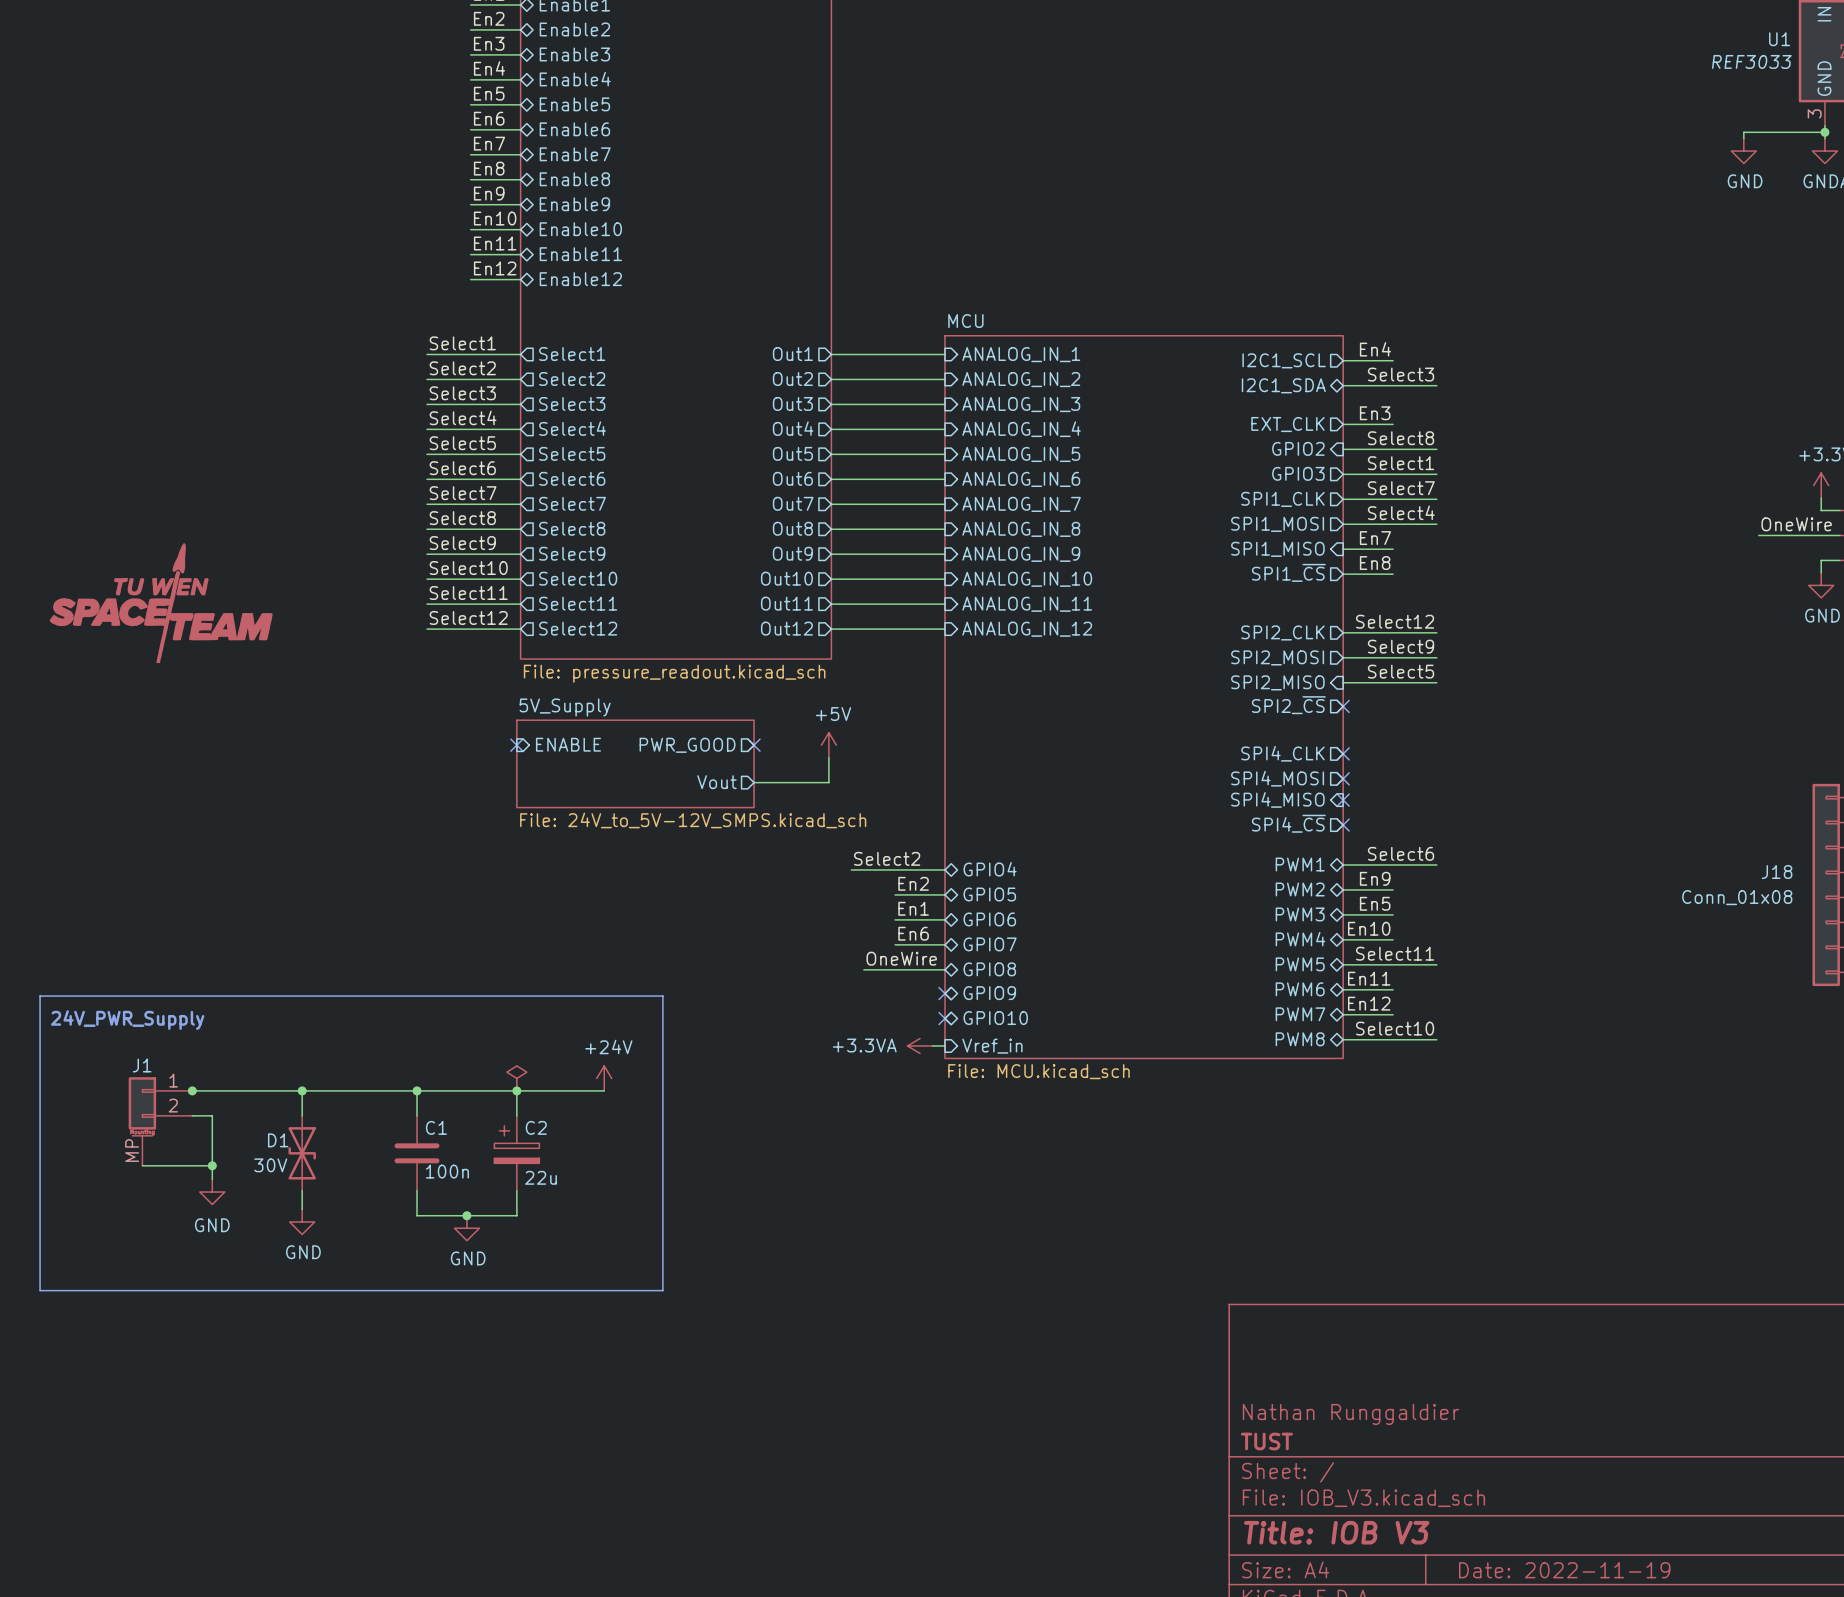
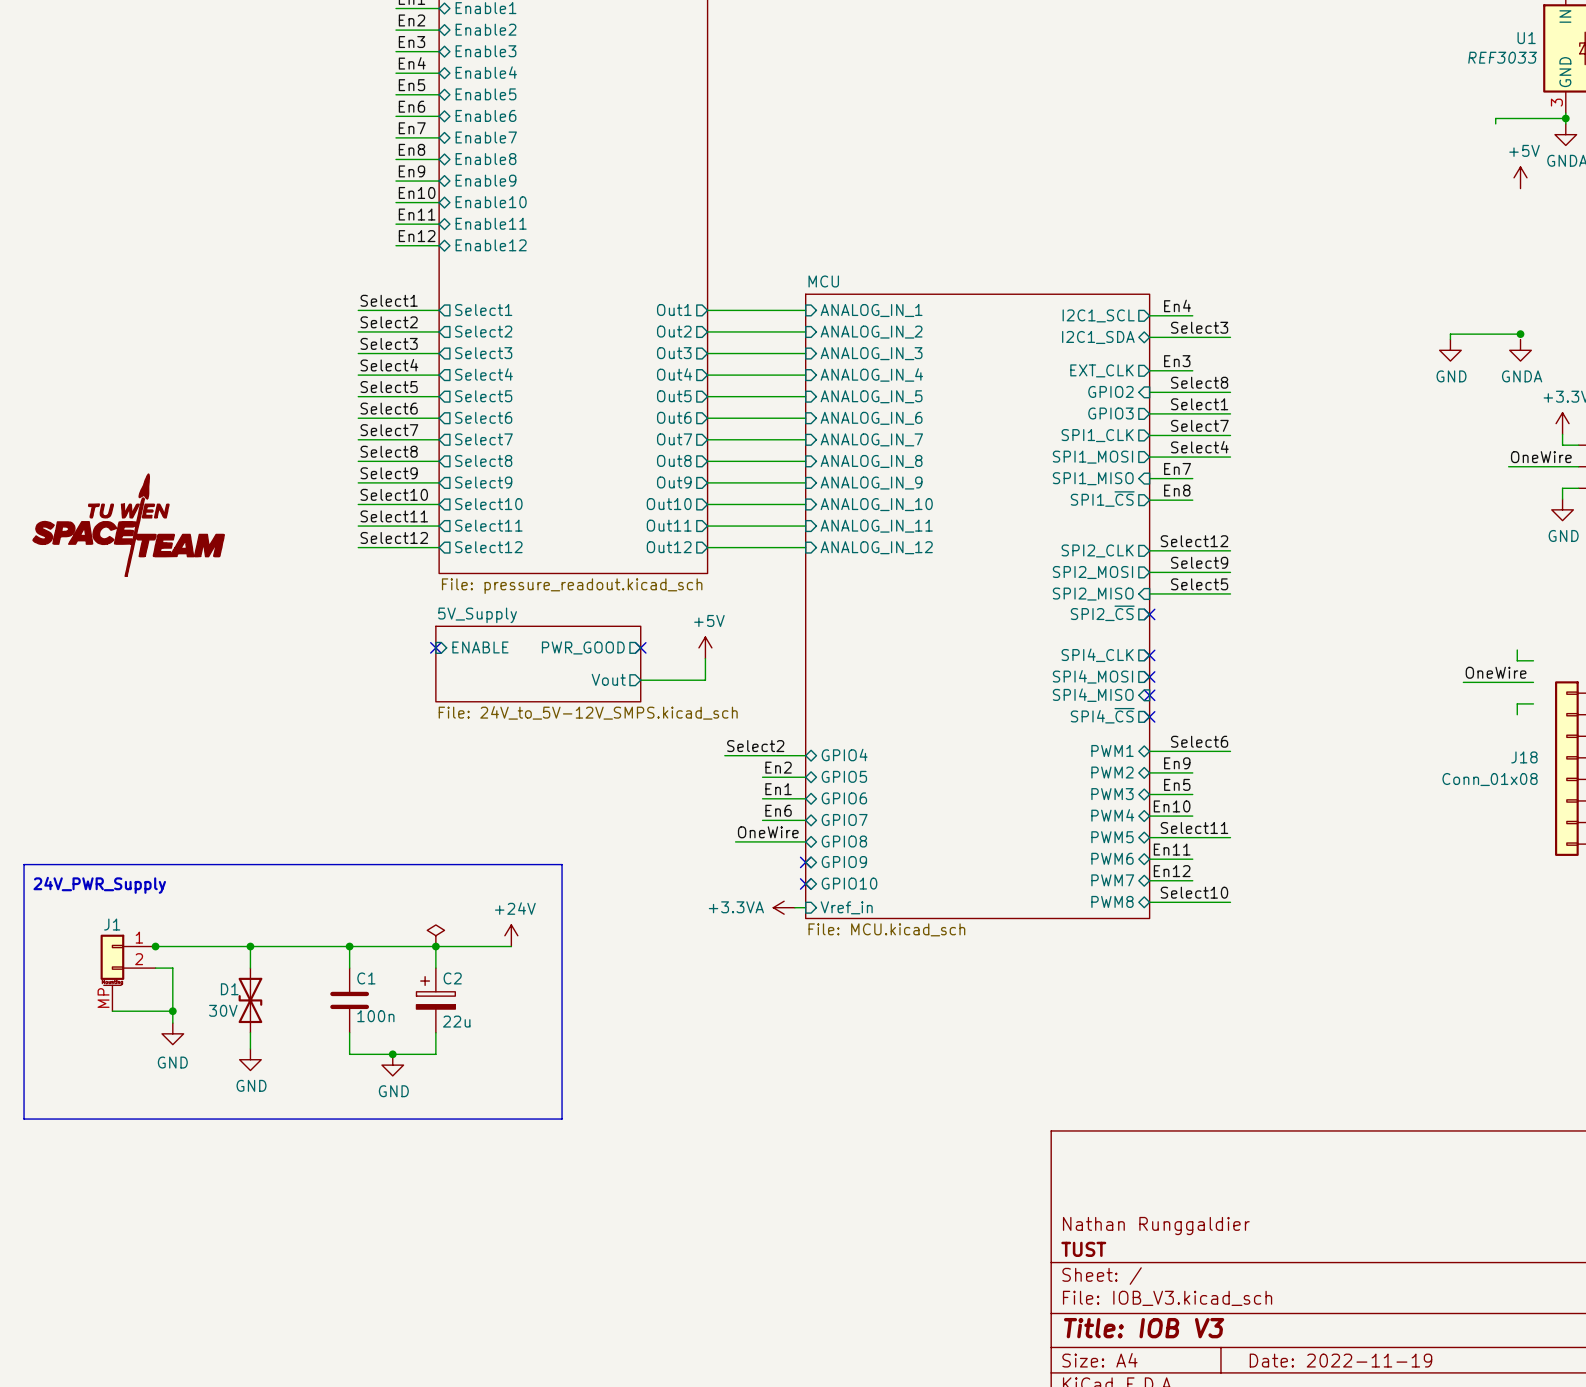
power symbol: GND (1743, 151) -> none
power symbol: none -> +5V (1520, 177)
wire: none -> (1520, 334) (1450, 334) (1450, 339)
junction: none -> (1520, 334)
power symbol: none -> GND (1450, 350)
power symbol: none -> GNDA (1520, 350)
wire: none -> (1517, 650) (1517, 660) (1533, 660)
label: none -> OneWire (1496, 672)
wire: none -> (1463, 682) (1533, 682)
wire: none -> (1533, 703) (1517, 703) (1517, 714)

